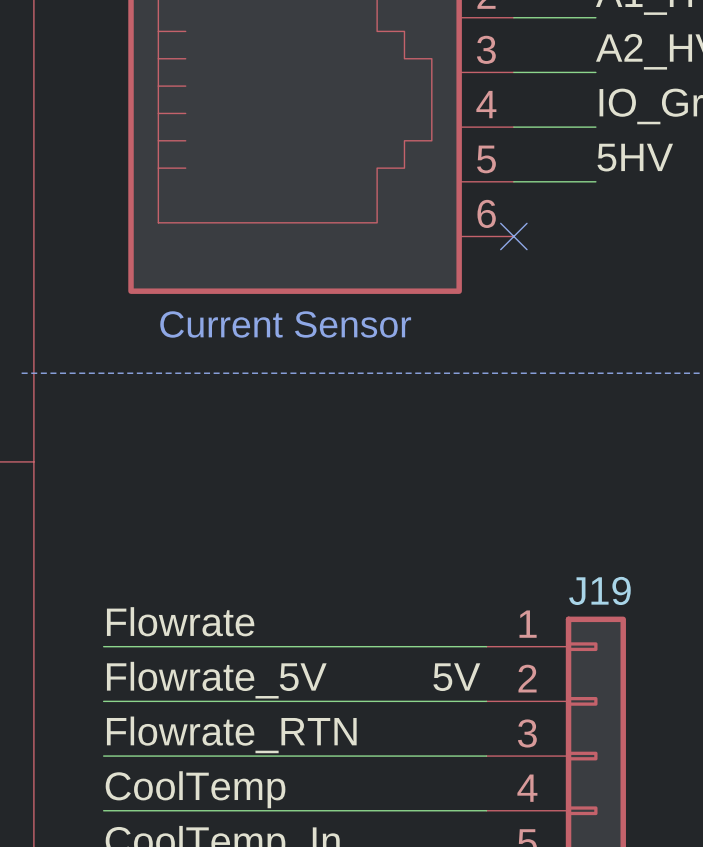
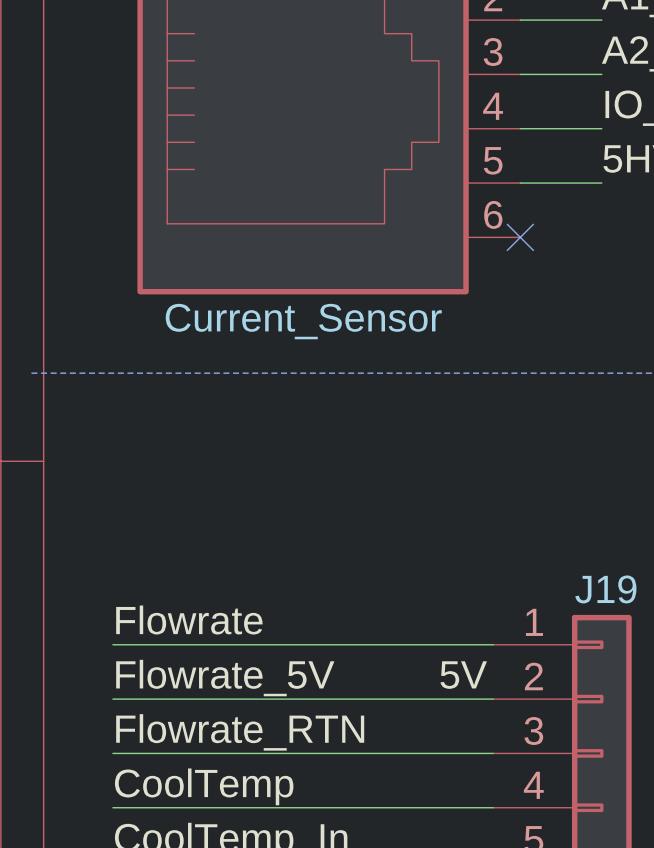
part value: none -> Current_Sensor (303, 321)
text: Current Sensor (285, 324) -> none

